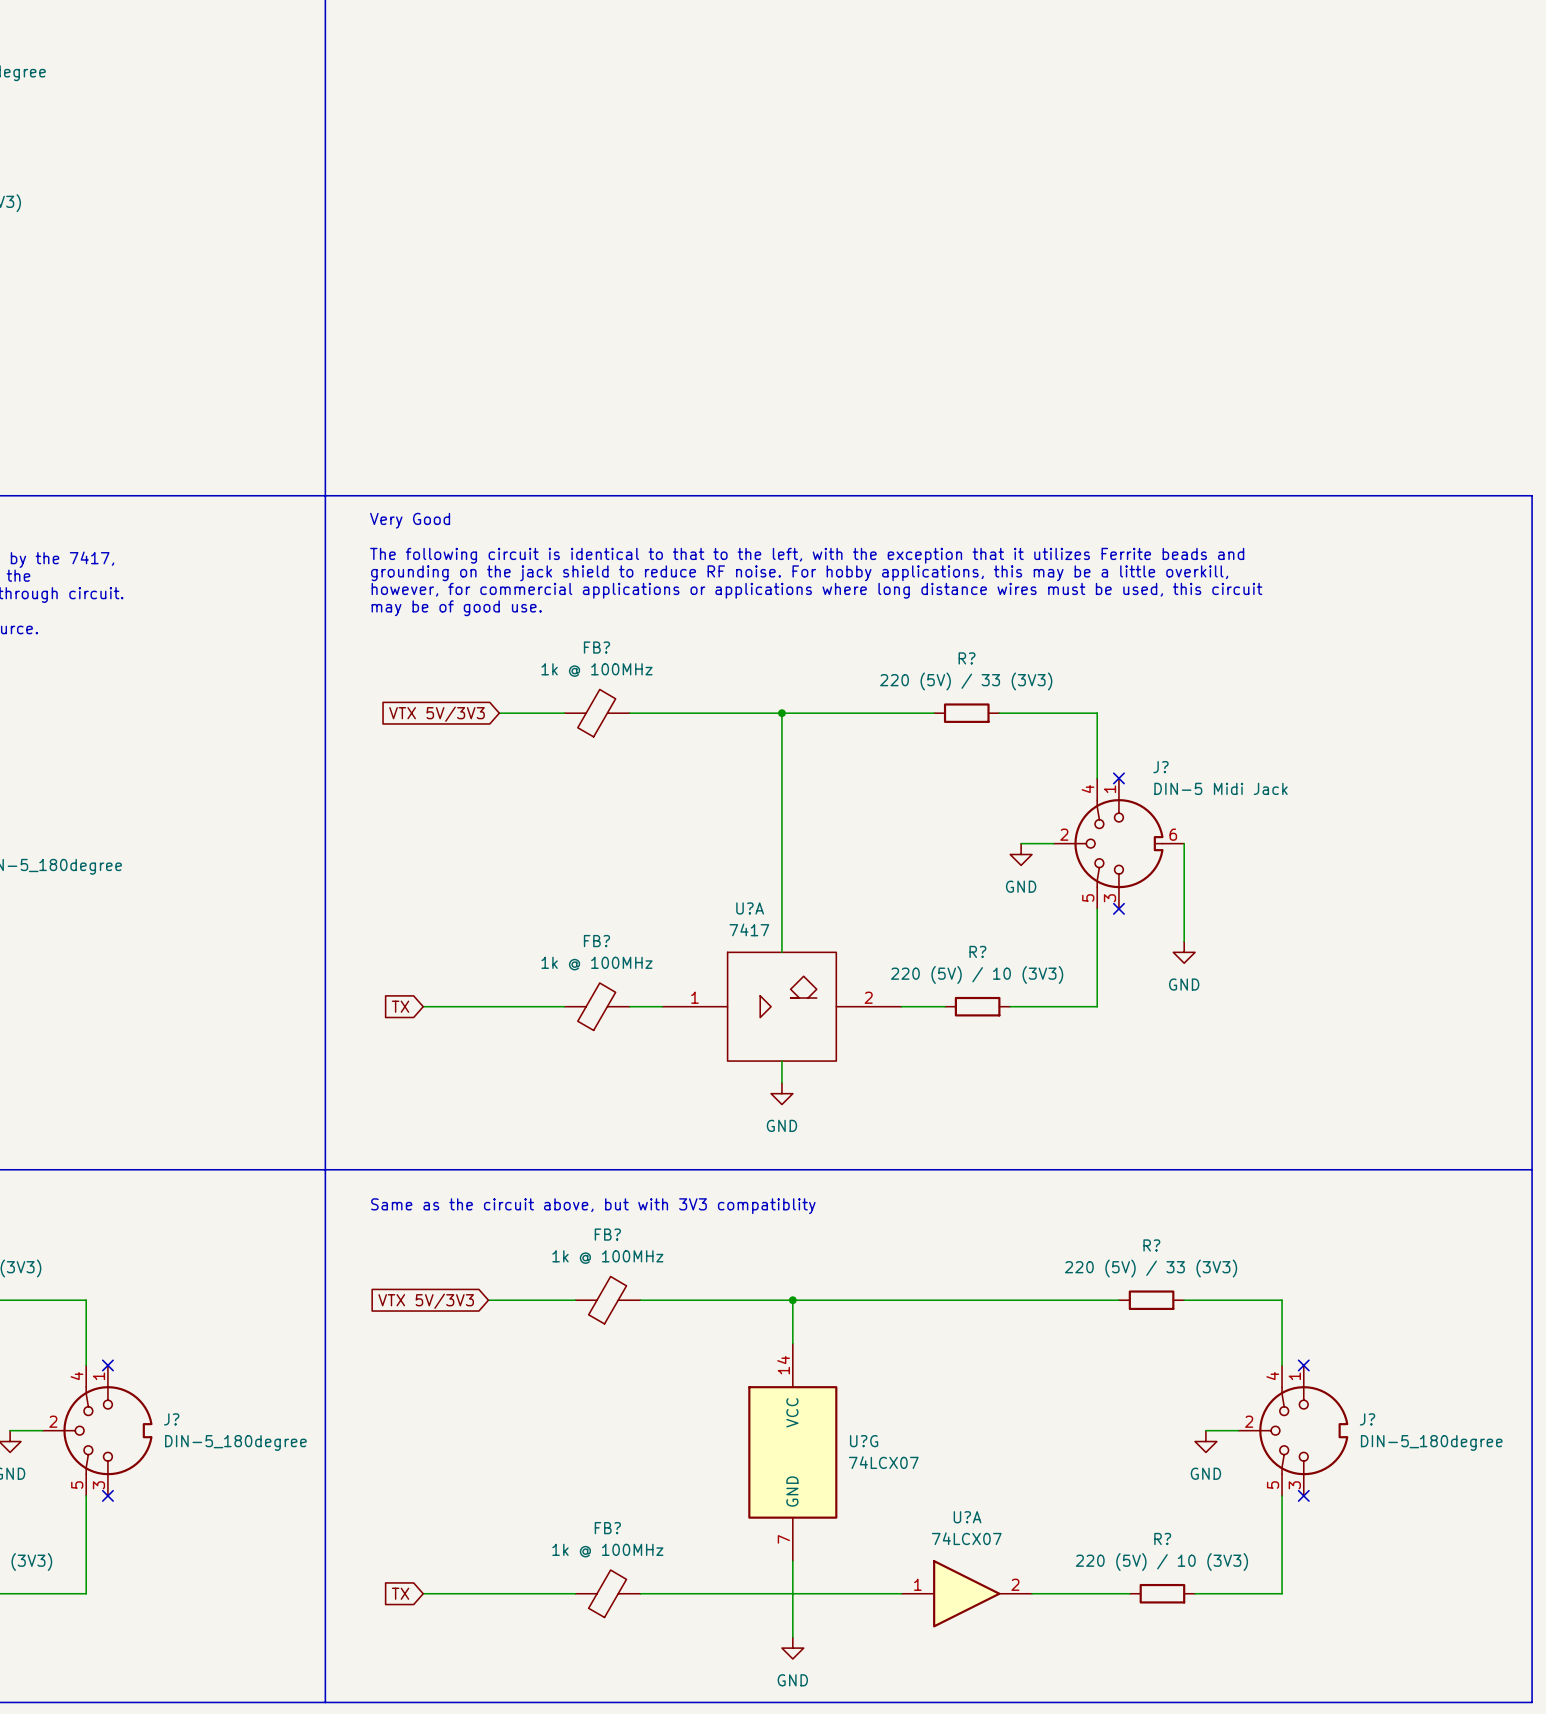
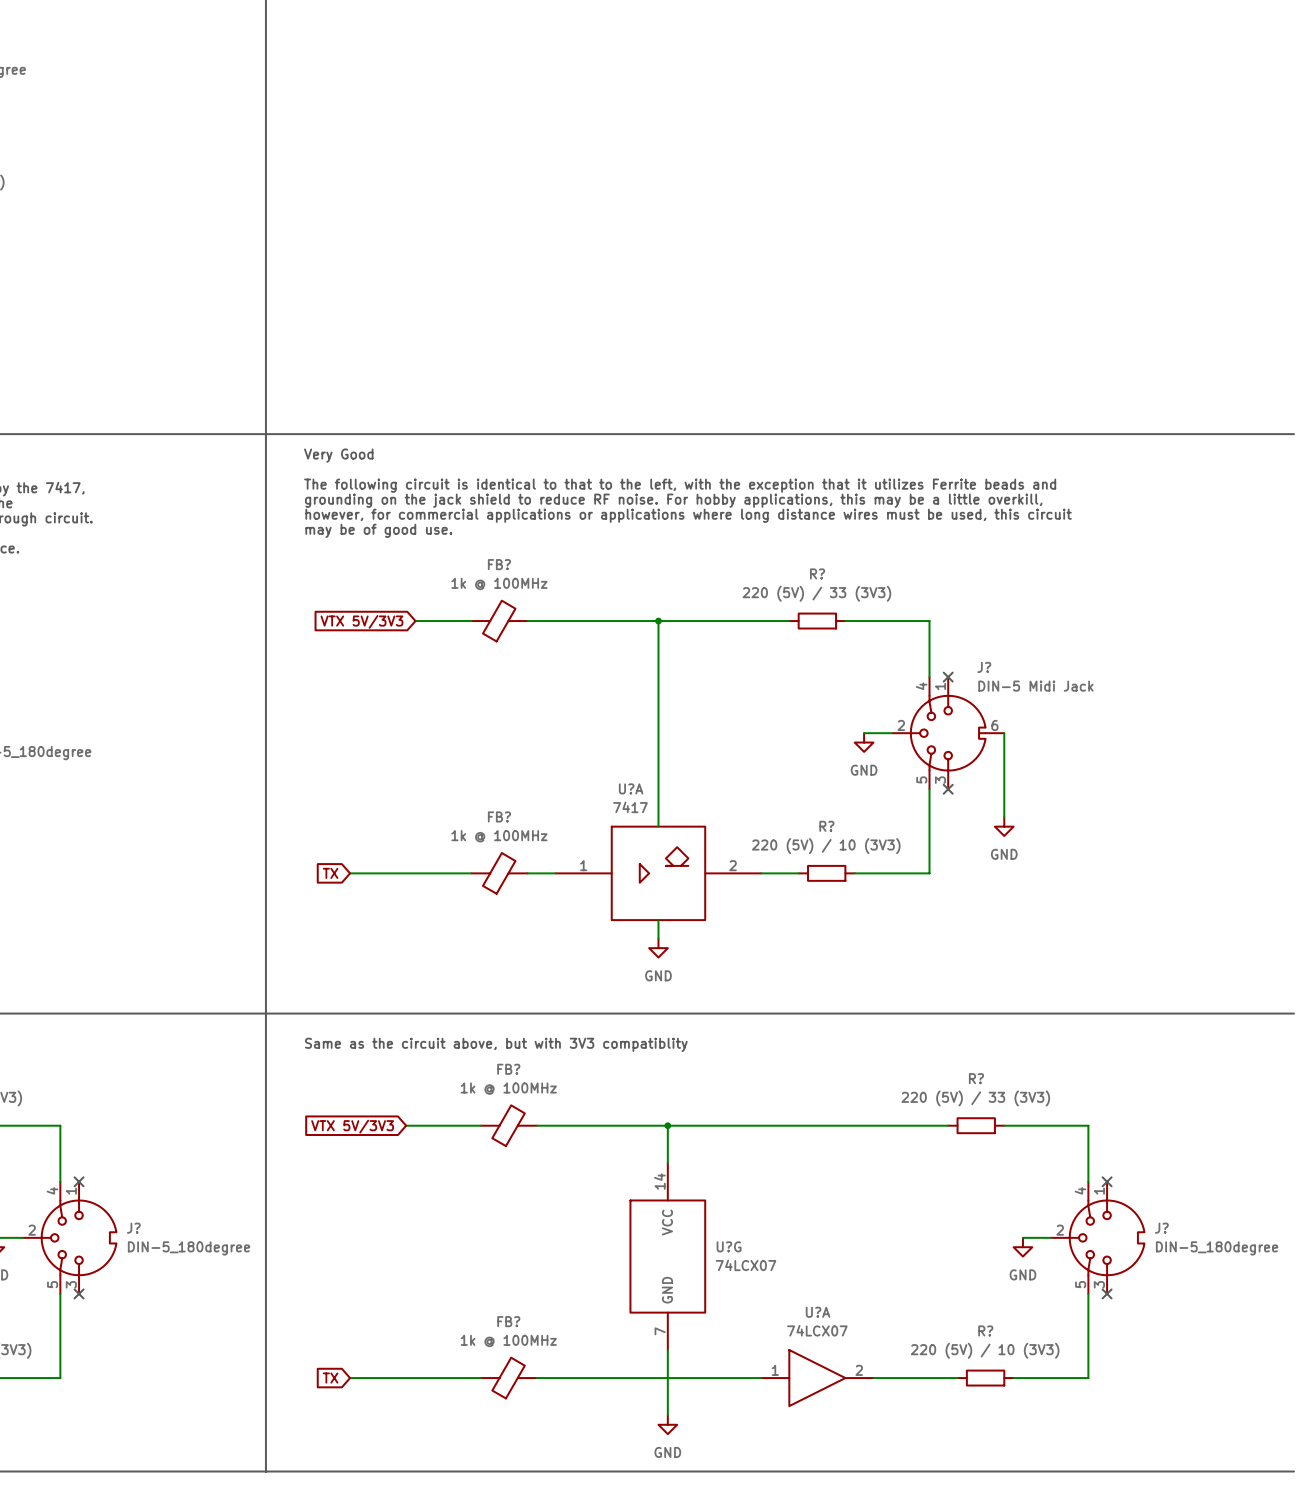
line: (1521, 495) (1532, 495) (1532, 1702) (1521, 1702) -> none
line: (1521, 1169) (1532, 1169) -> none

